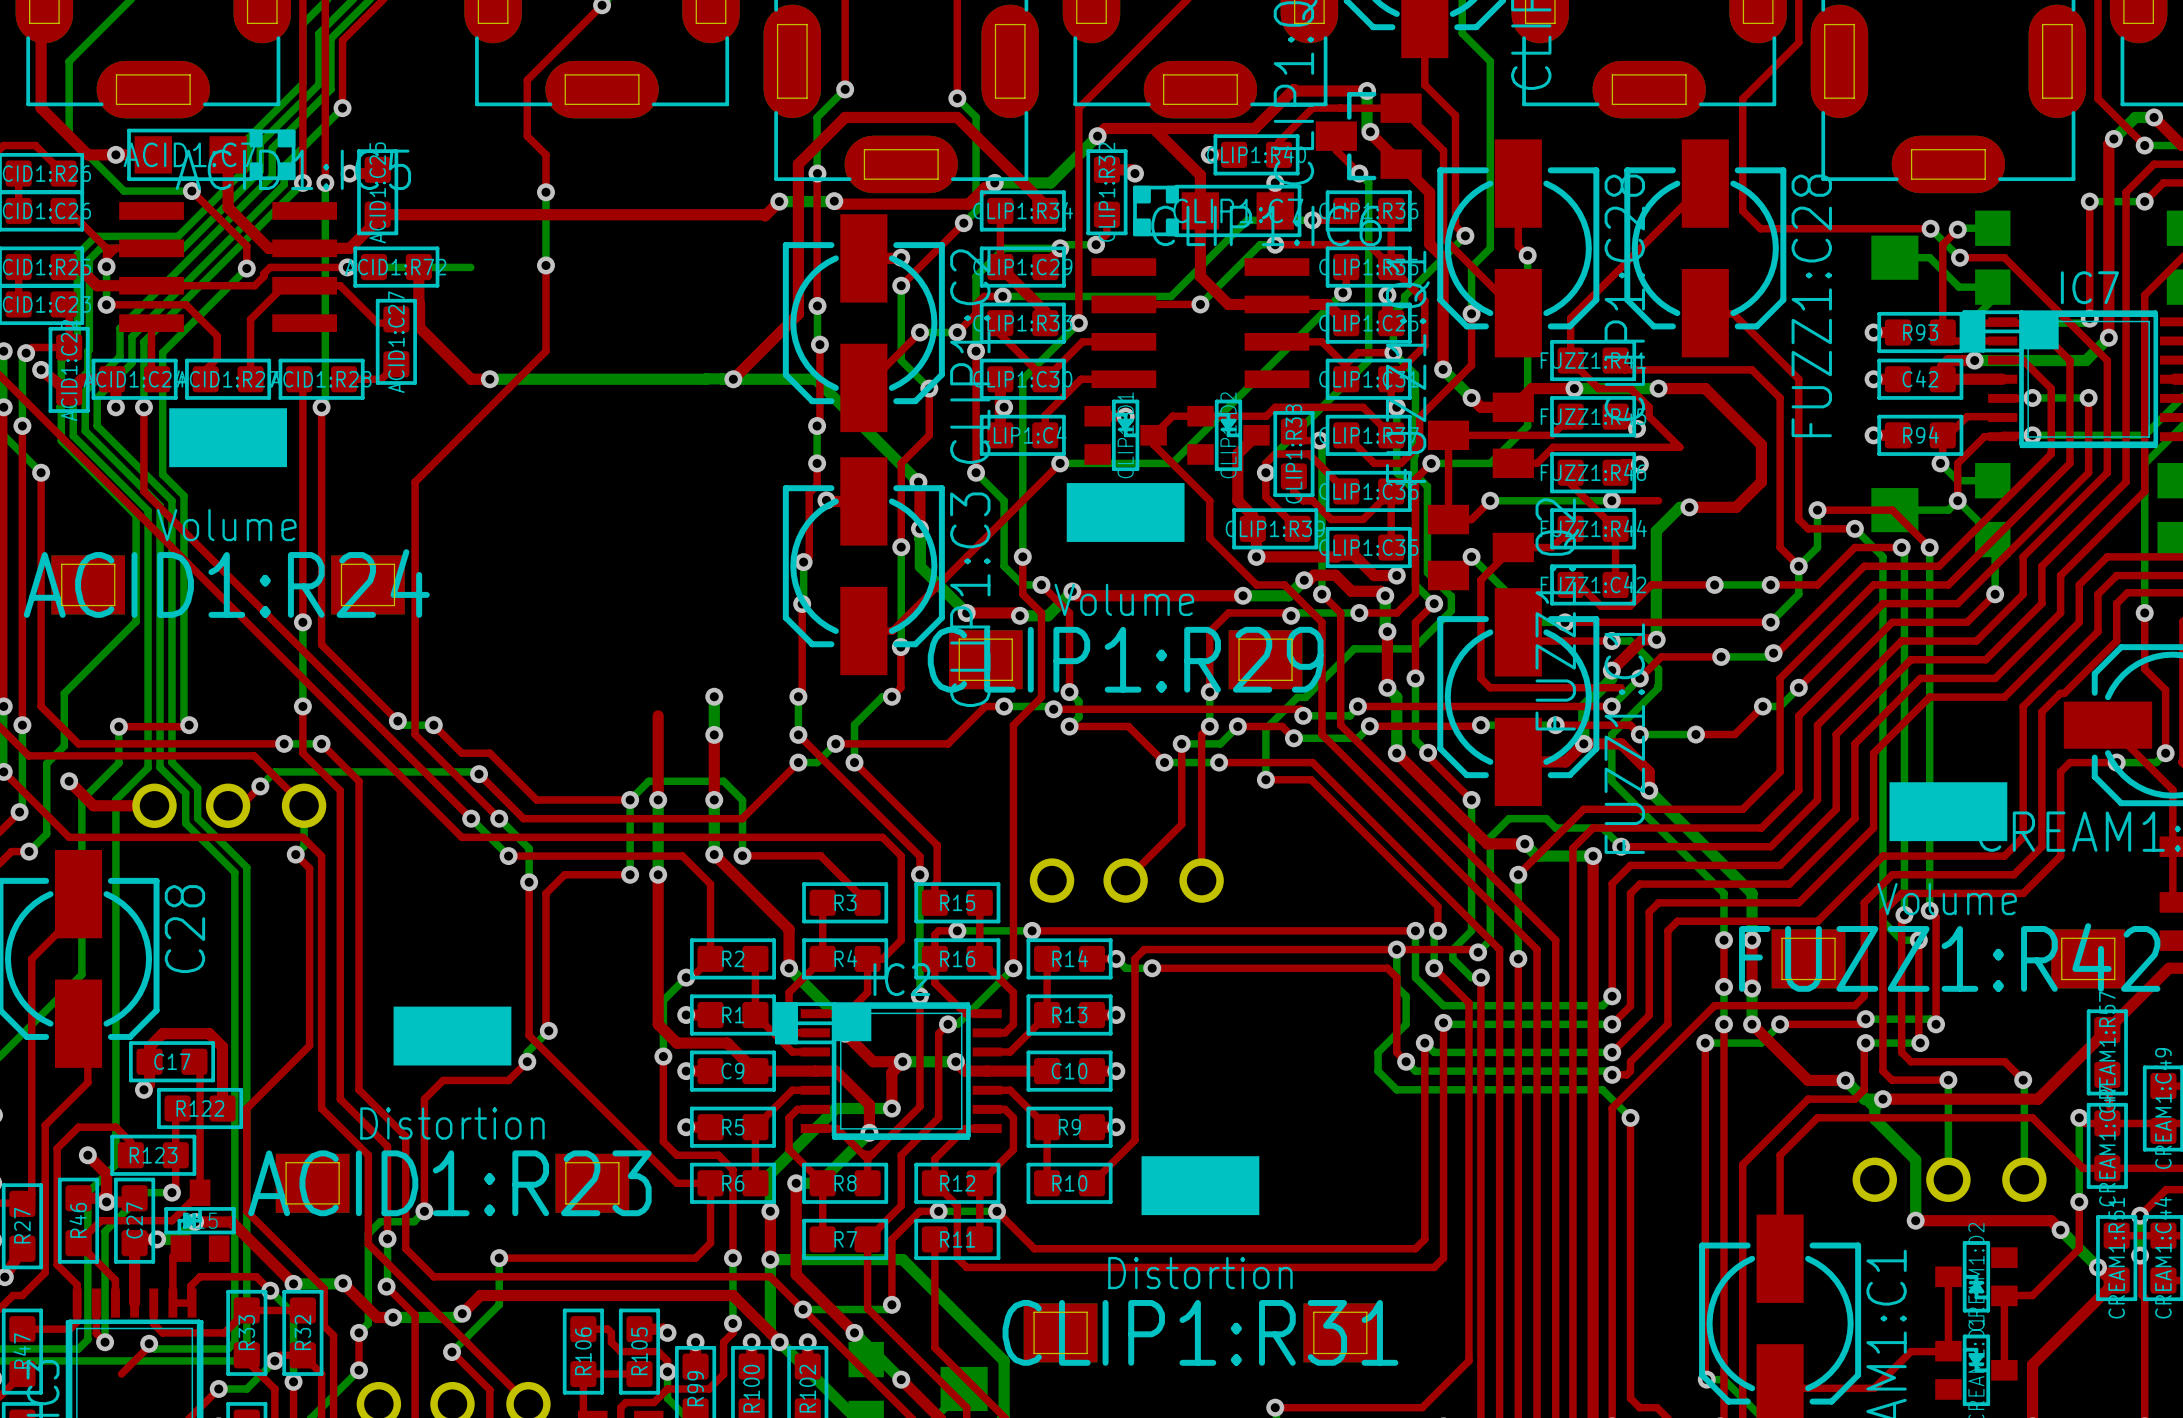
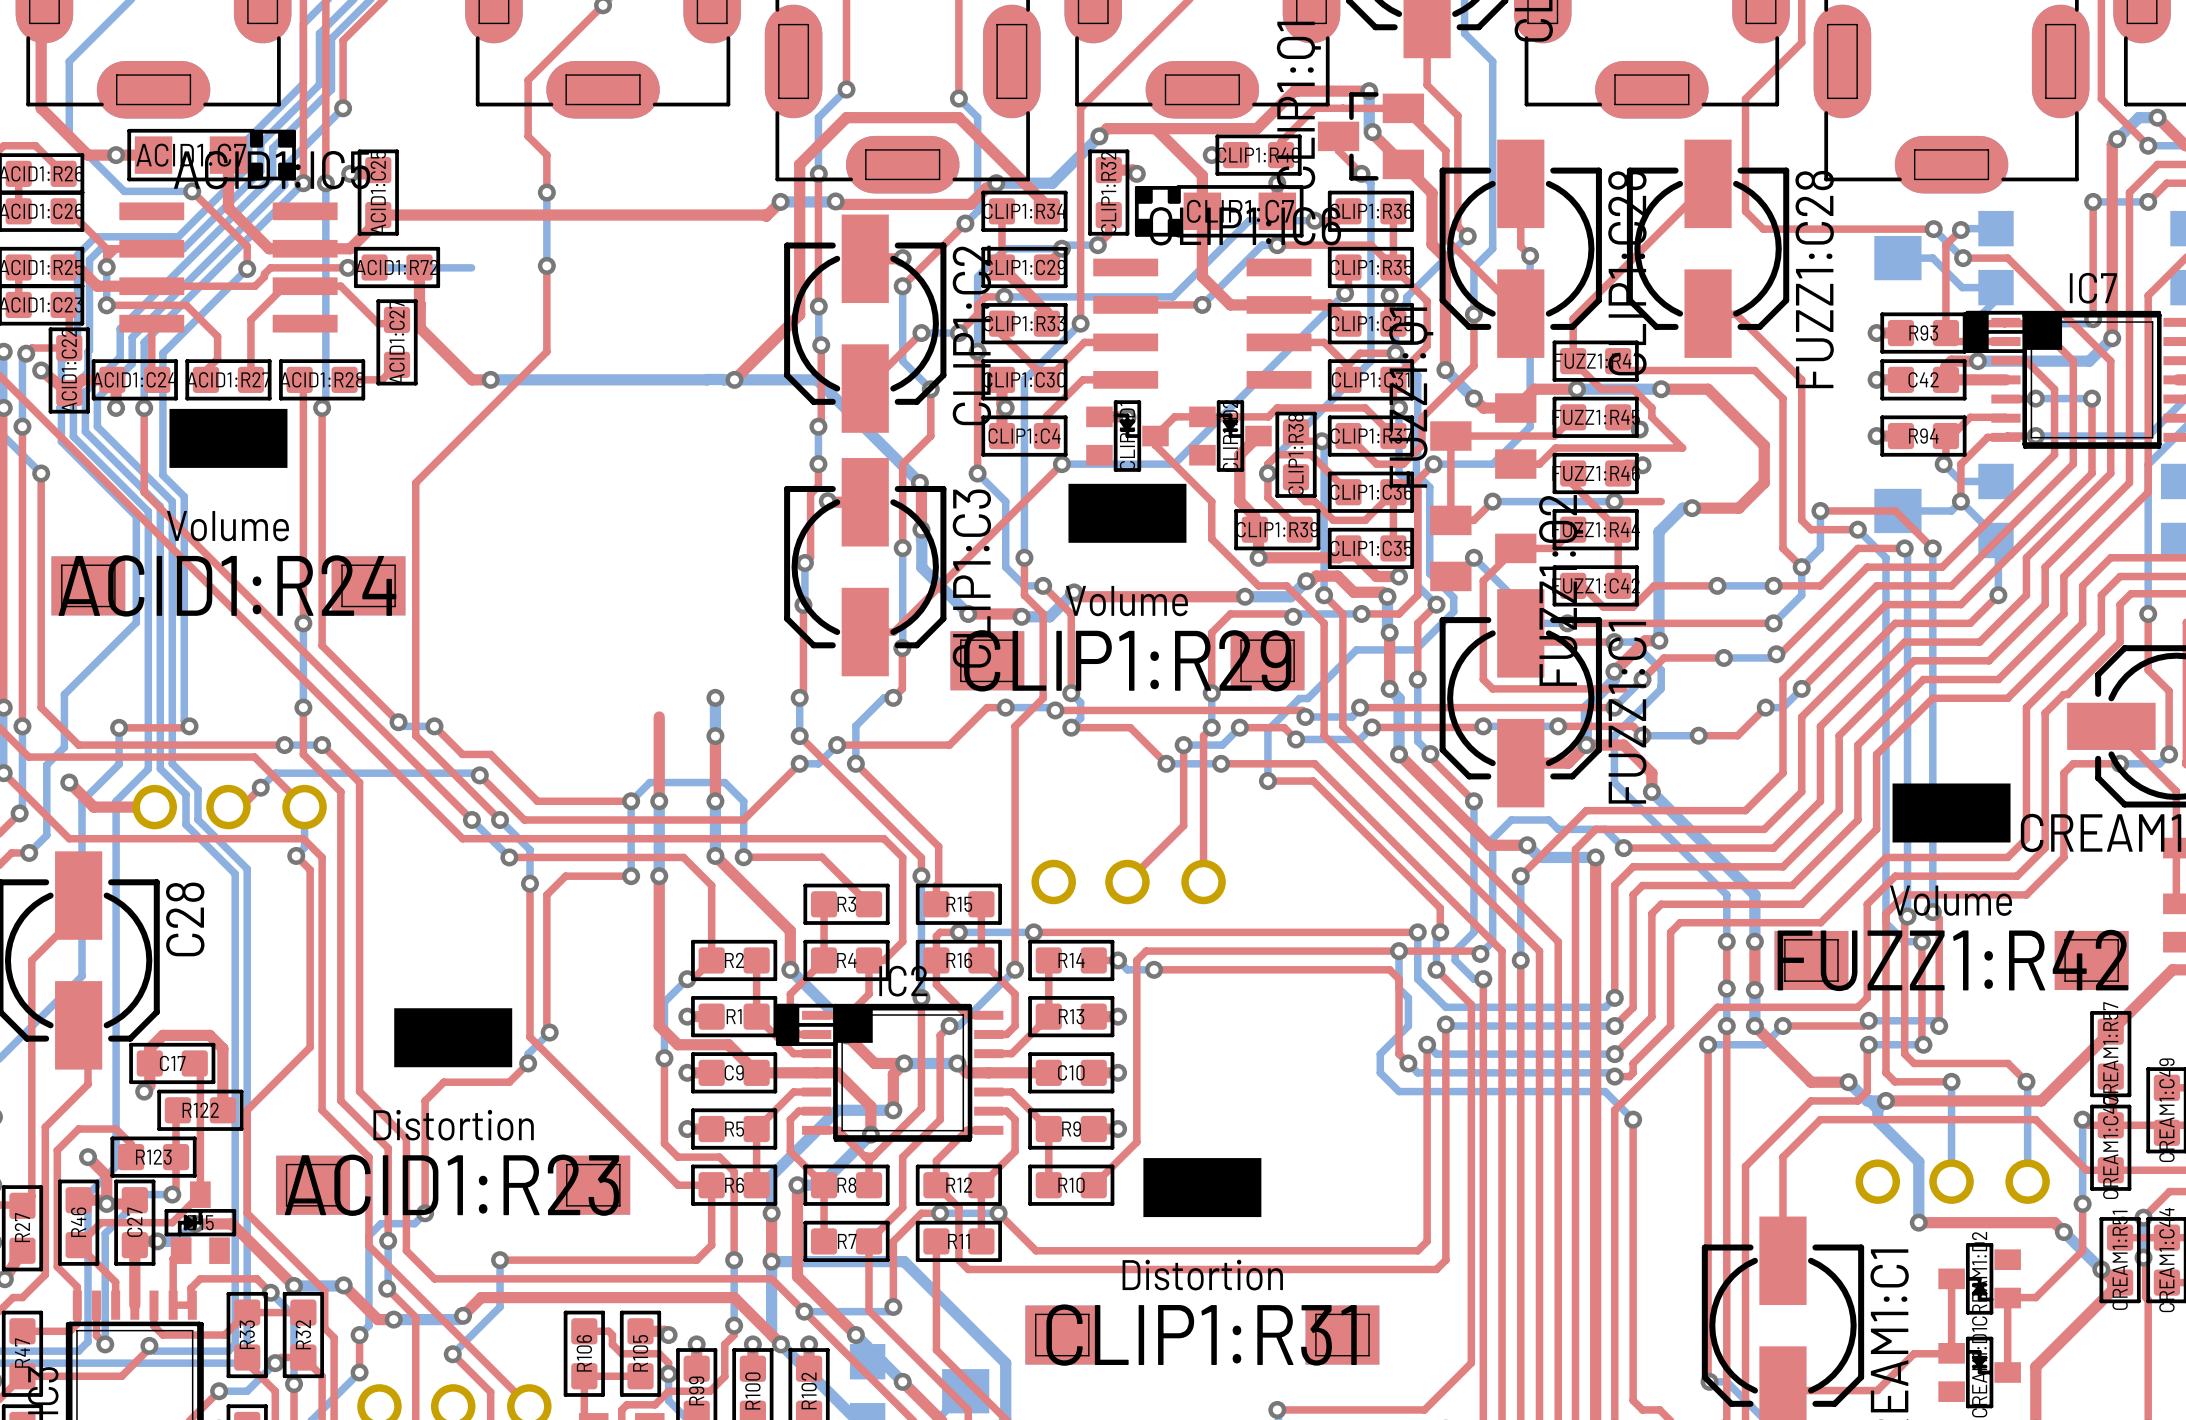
top track: none -> (22, 1376) (121, 1376)

